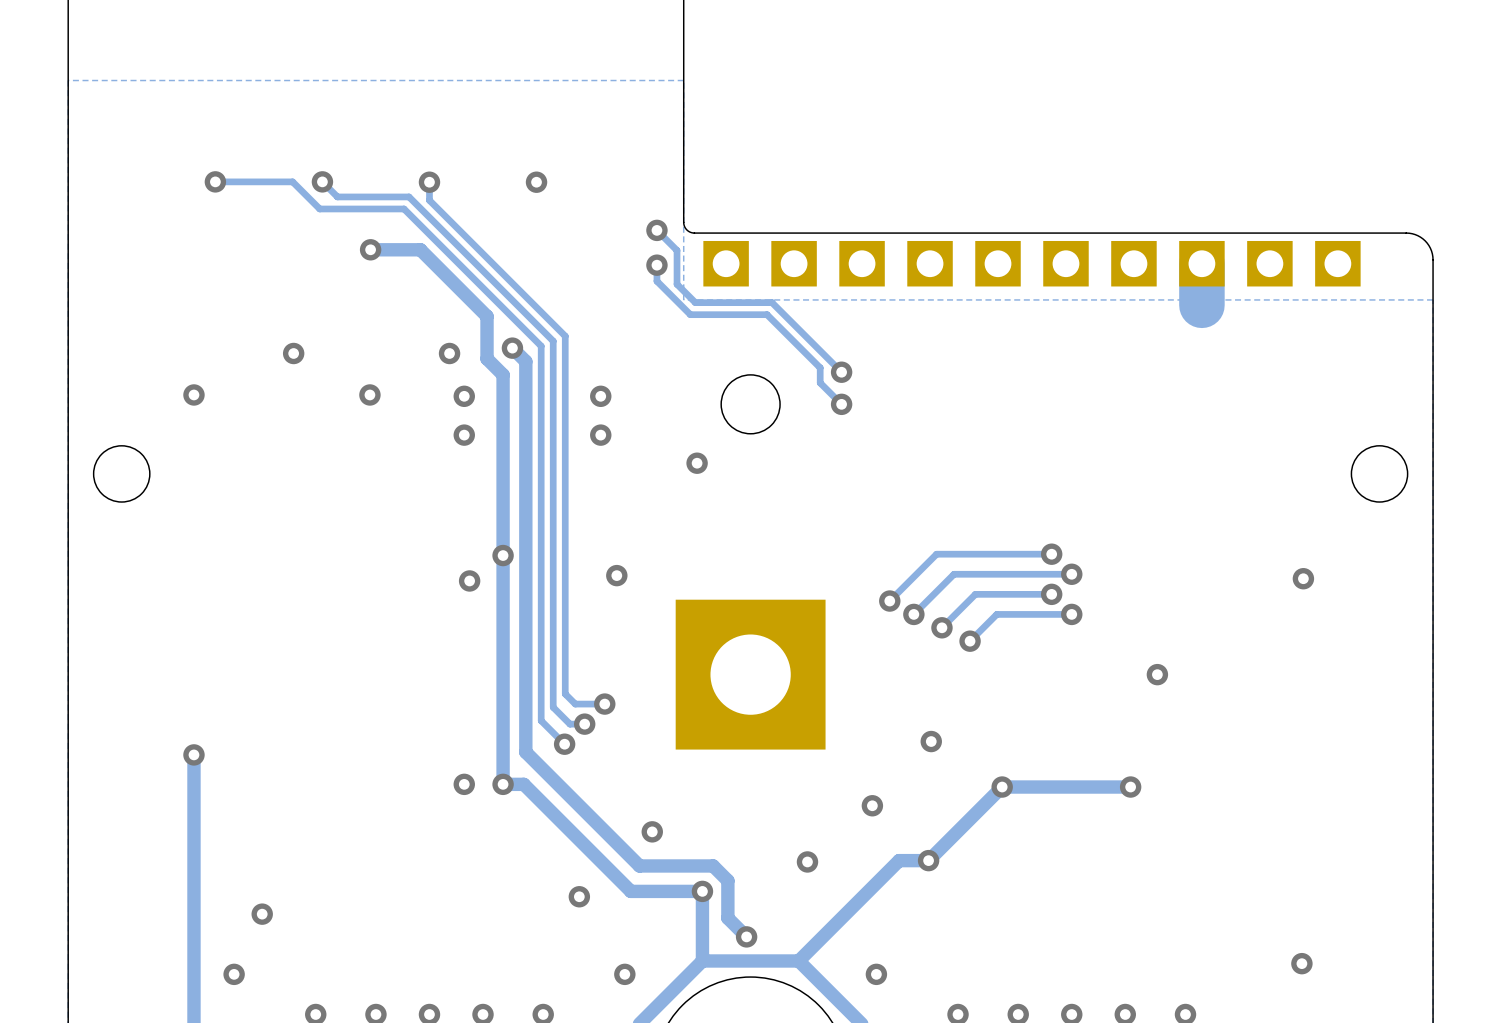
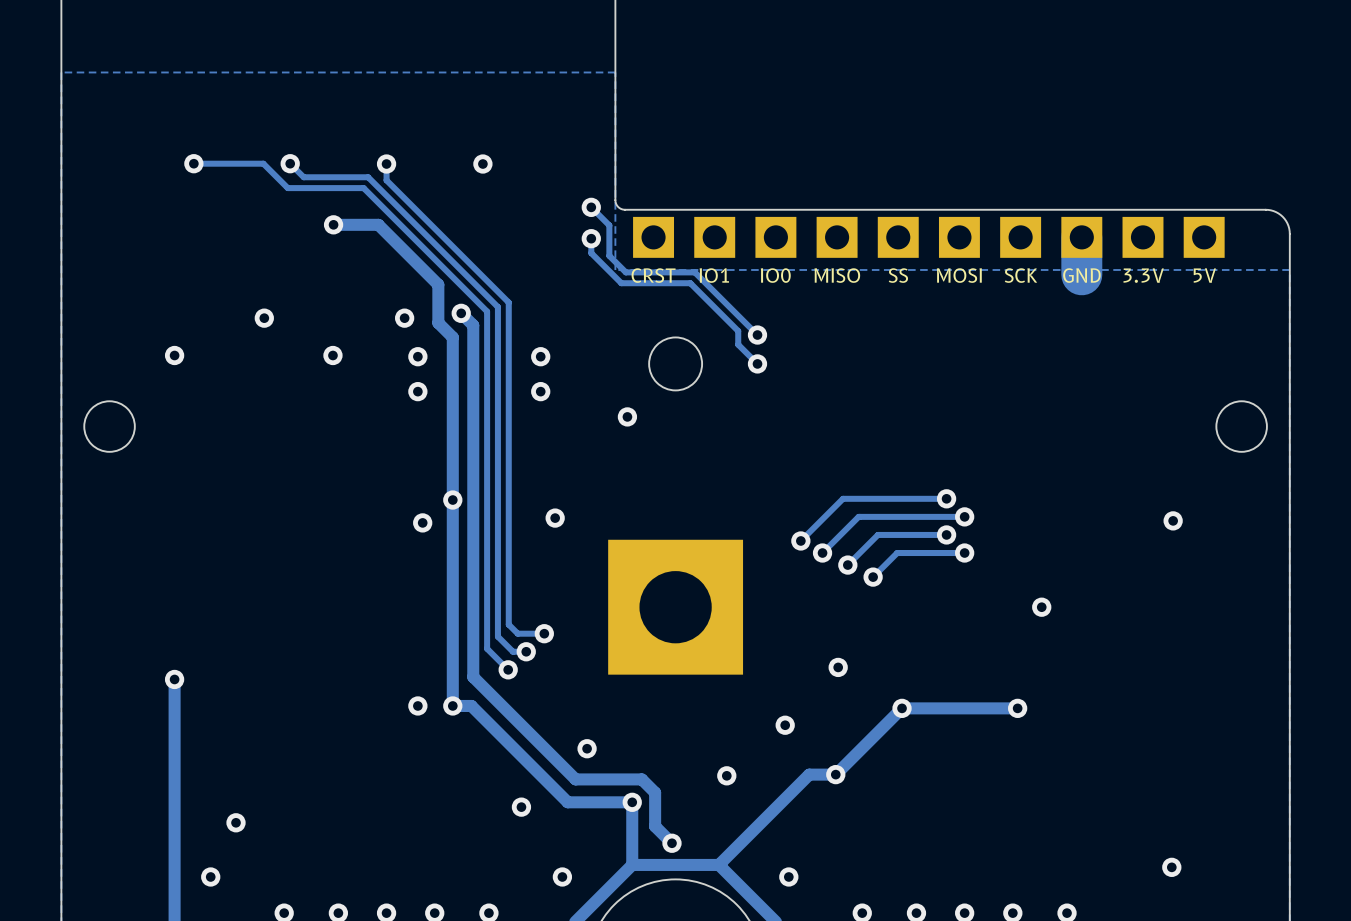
text: none -> CRST (653, 275)
text: none -> IO1 (714, 275)
text: none -> IO0 (775, 275)
text: none -> MISO (837, 275)
text: none -> SS (898, 275)
text: none -> MOSI (959, 275)
text: none -> SCK (1020, 275)
text: none -> GND (1081, 275)
text: none -> 3.3V (1143, 275)
text: none -> 5V (1204, 275)

